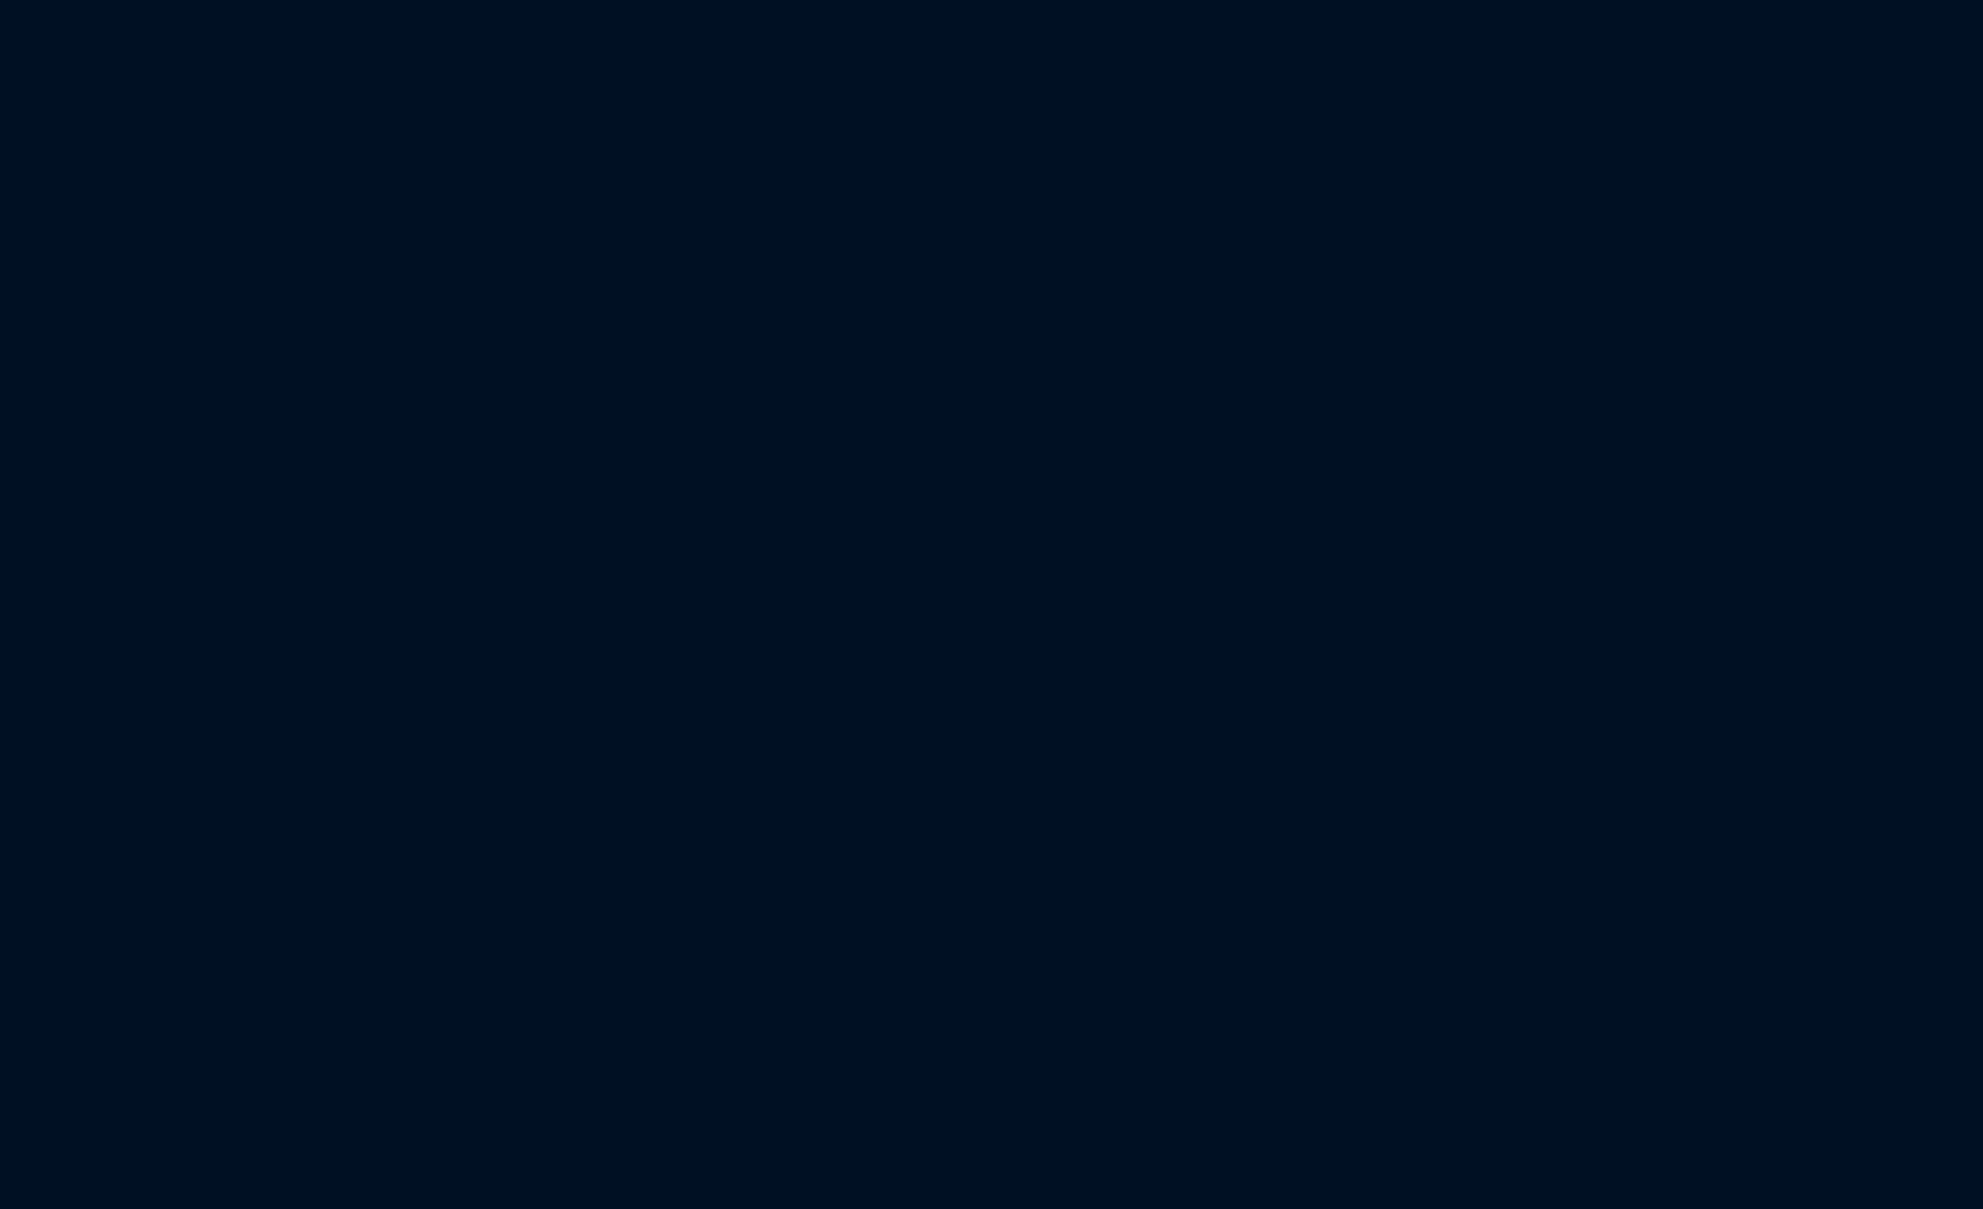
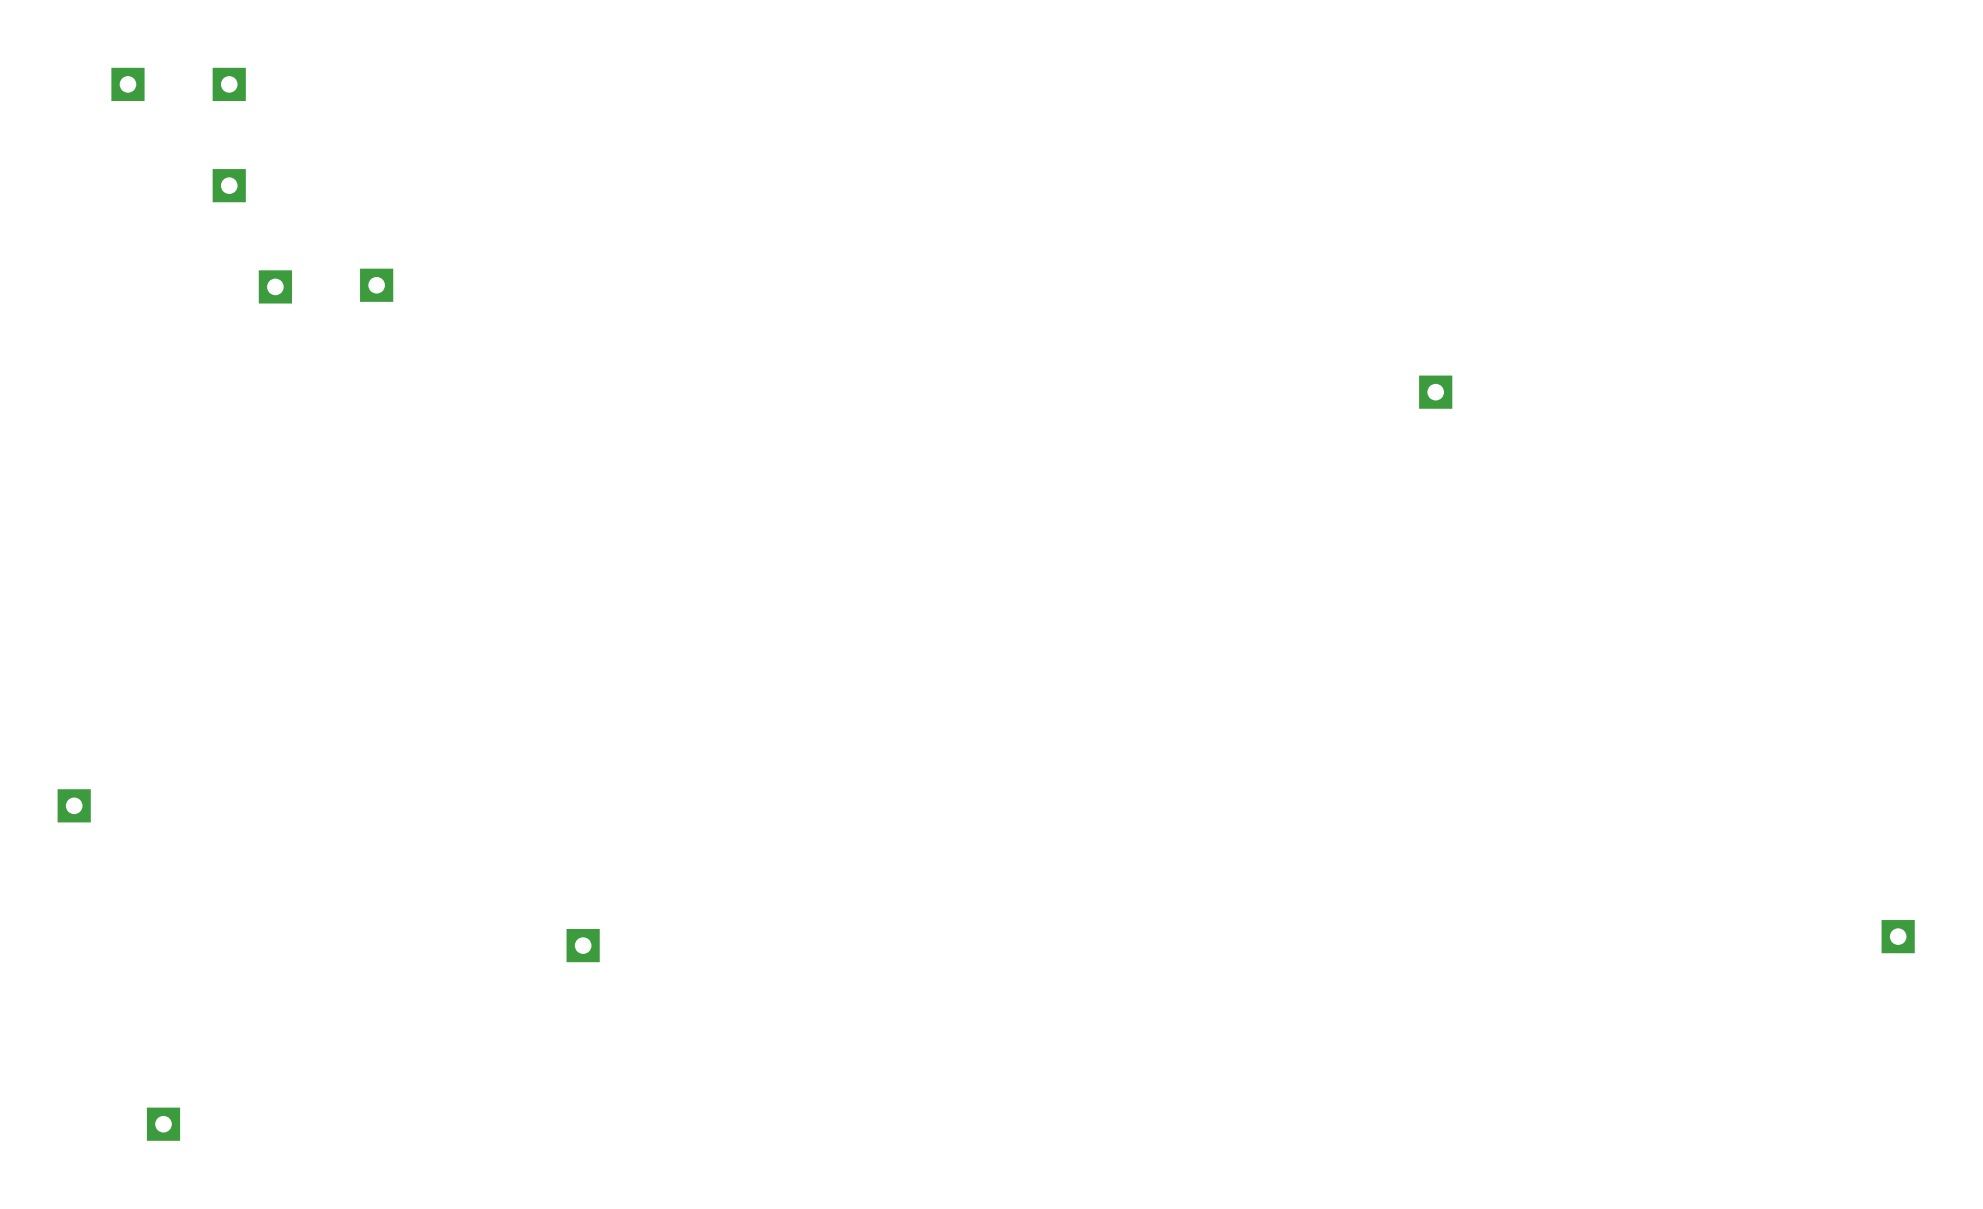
part: none -> (127, 84)
part: none -> (229, 84)
part: none -> (229, 185)
part: none -> (376, 285)
part: none -> (275, 286)
part: none -> (1435, 392)
part: none -> (74, 805)
part: none -> (1898, 936)
part: none -> (583, 945)
part: none -> (163, 1124)

